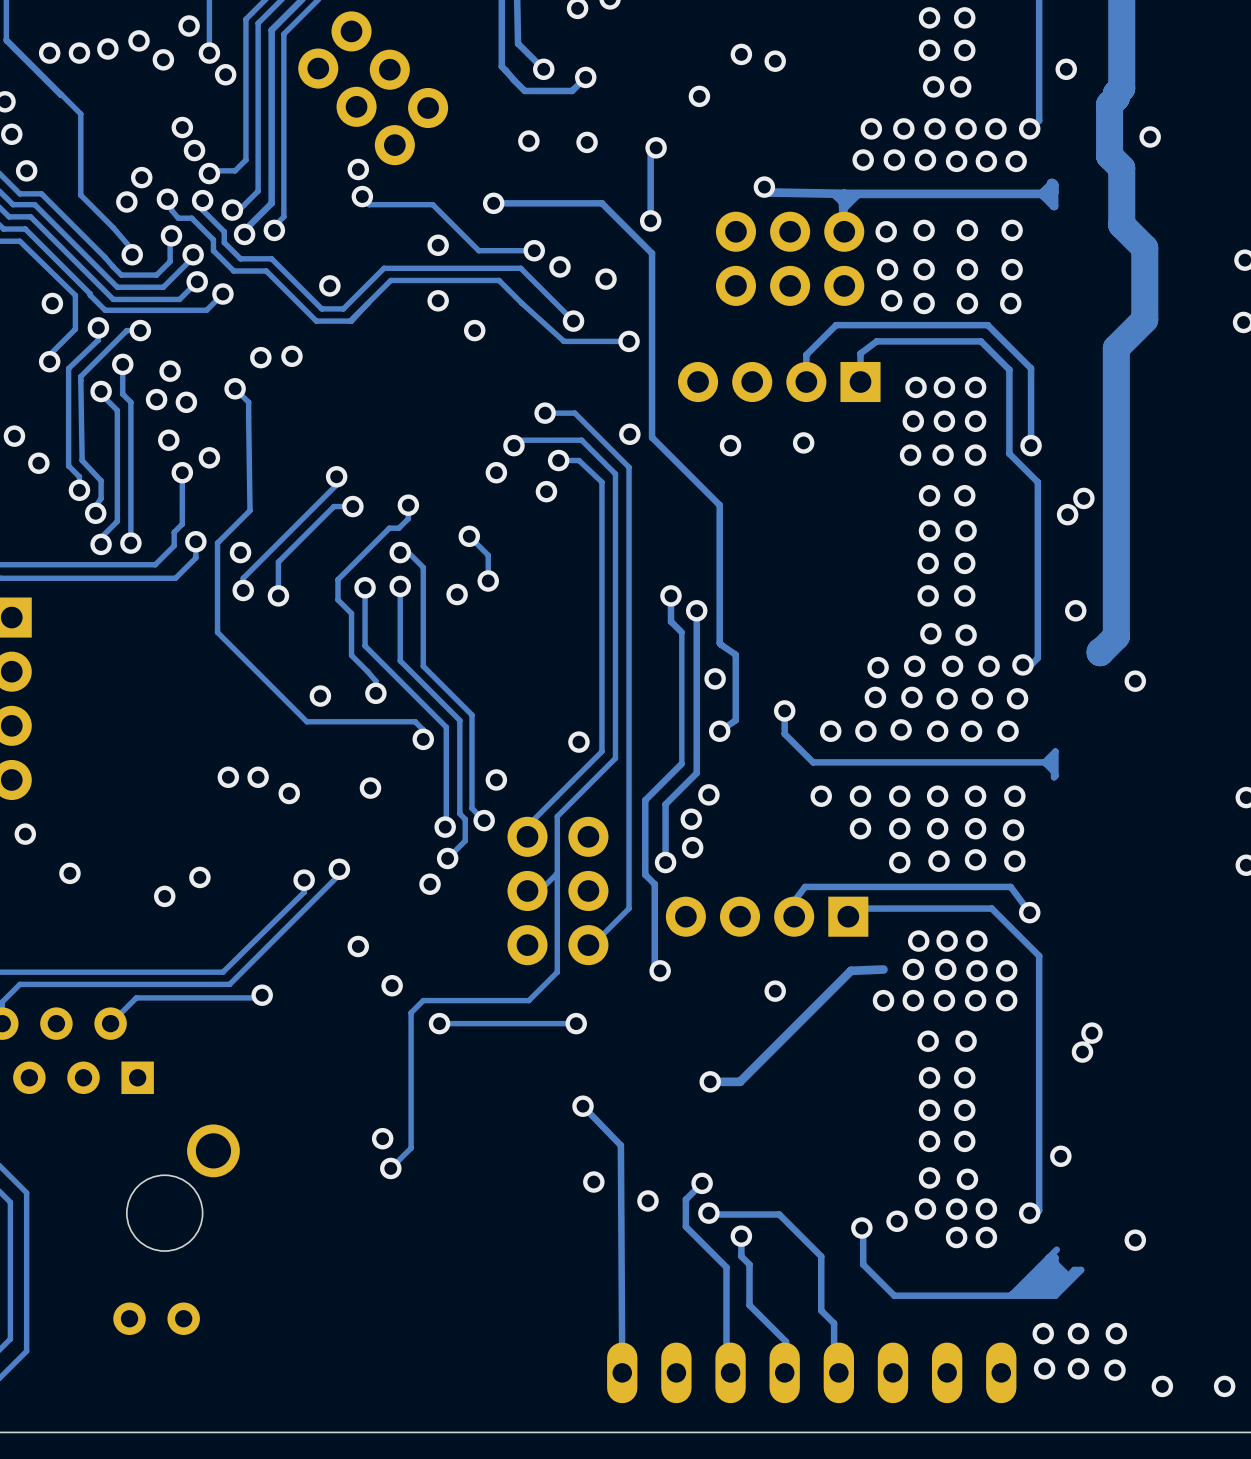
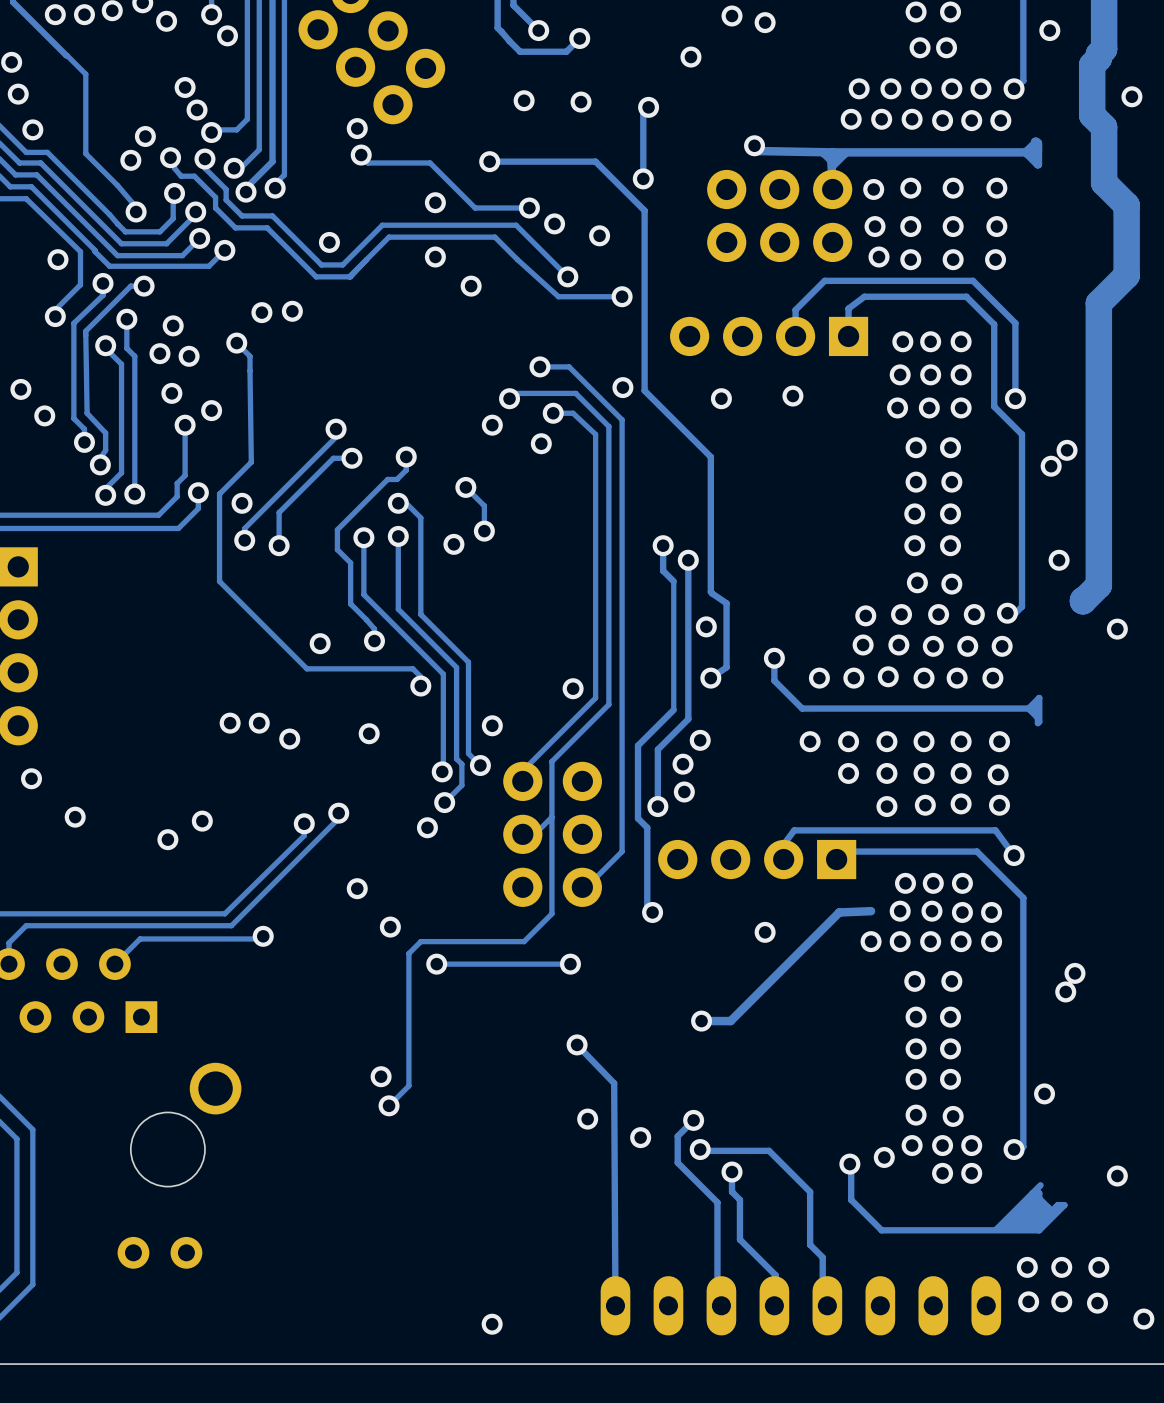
via: none -> (492, 1324)

